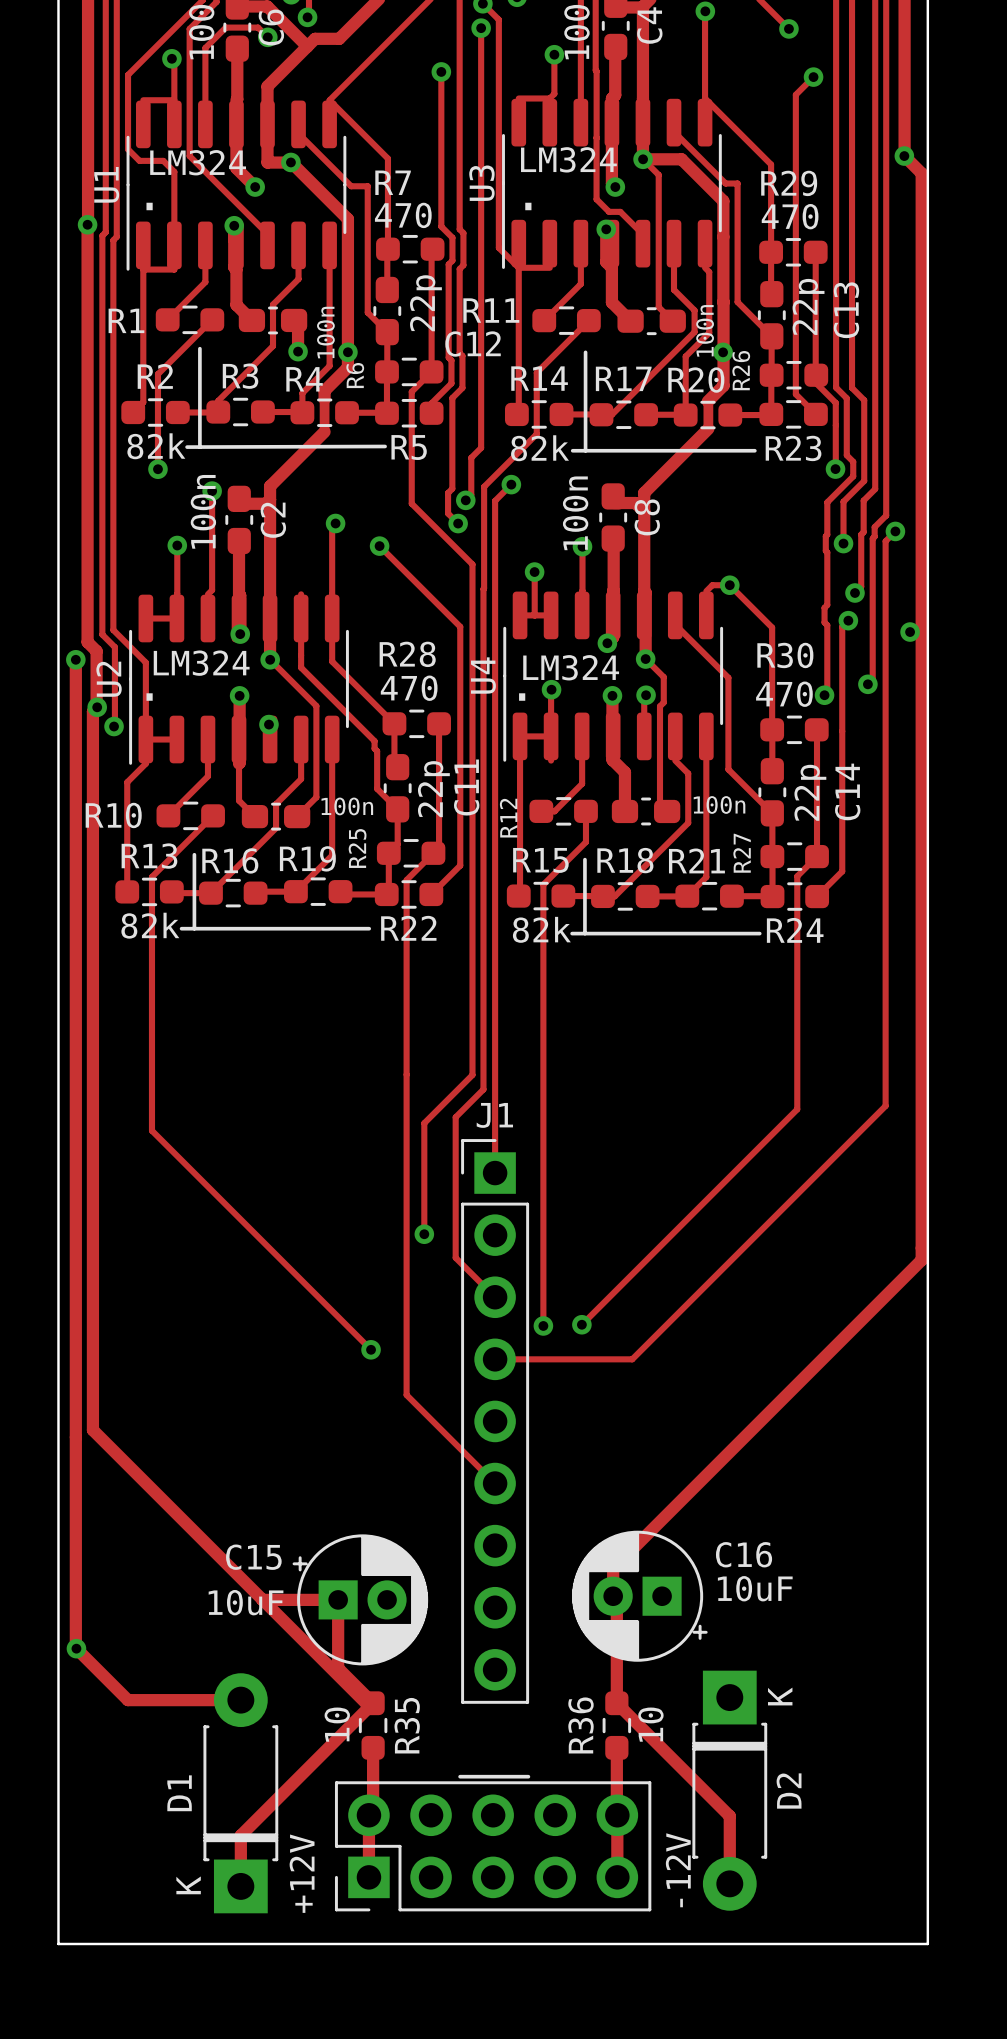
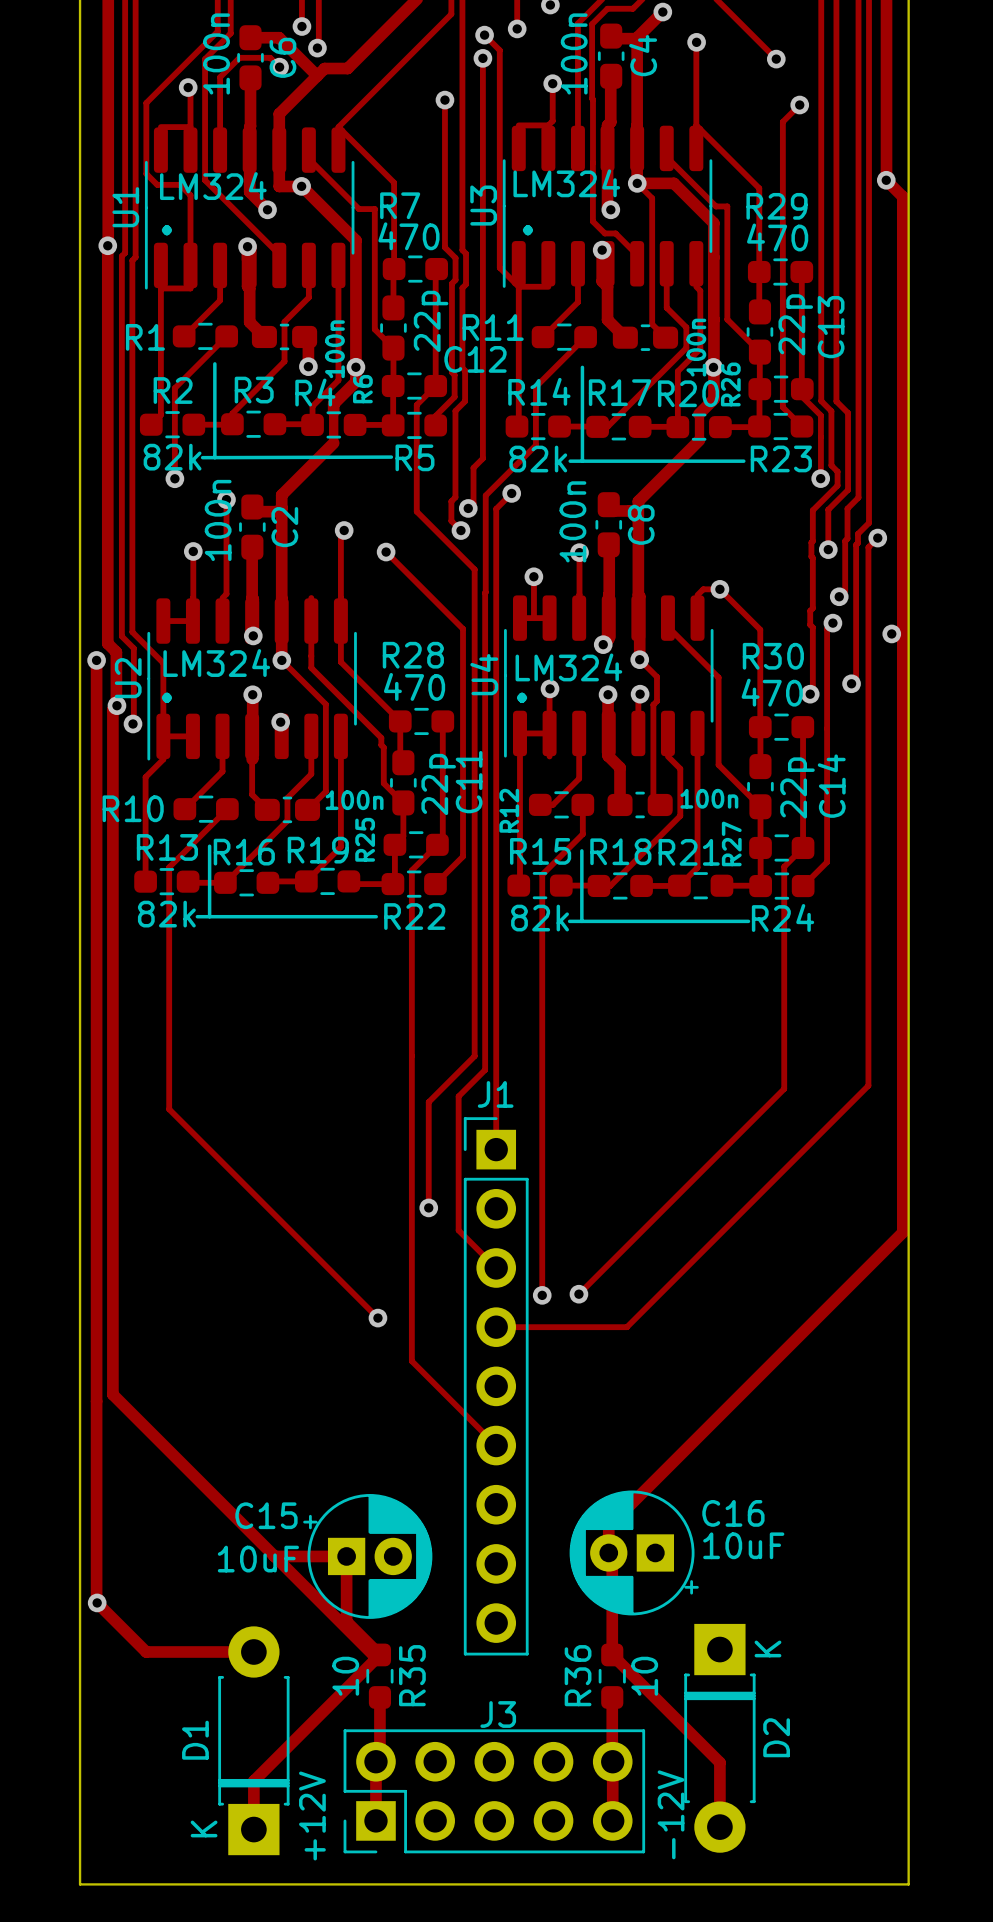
J3 name: none -> J3 (498, 1714)
line: (460, 1776) (528, 1776) -> none

